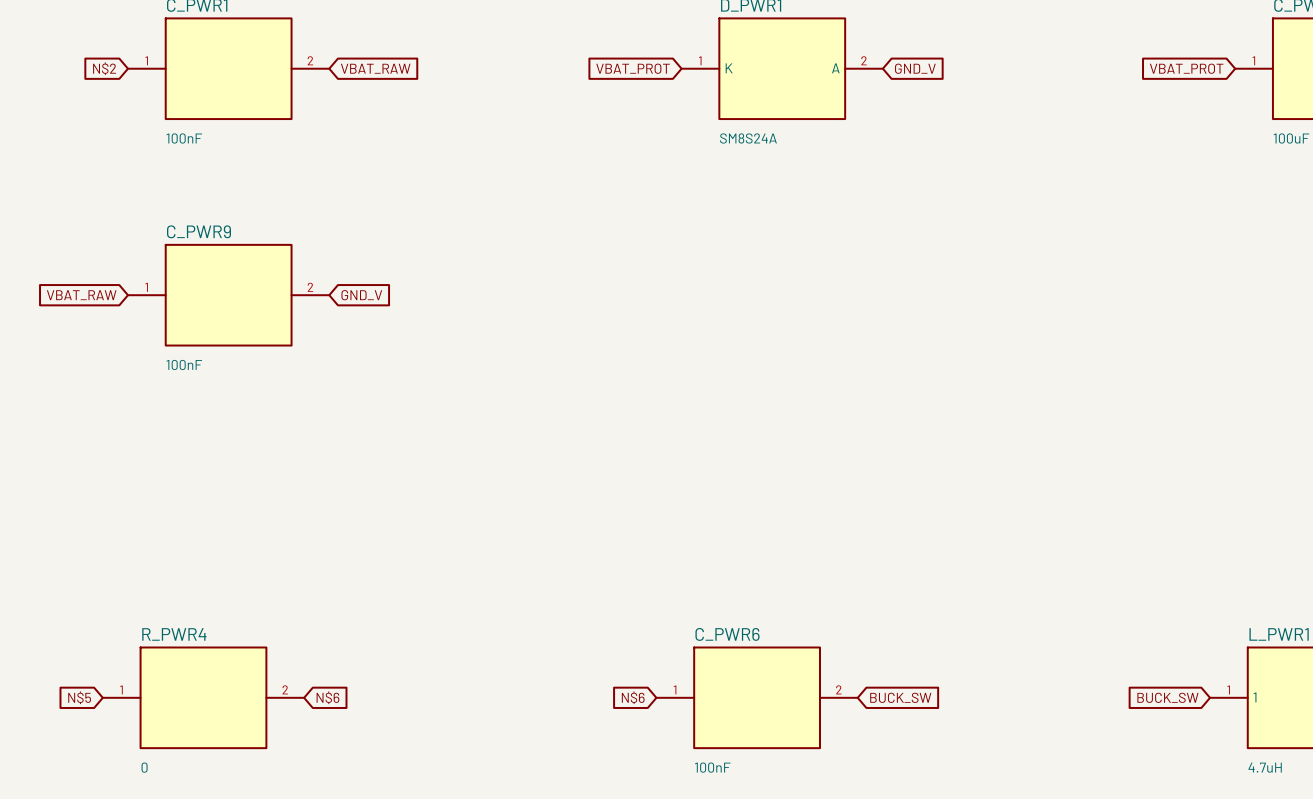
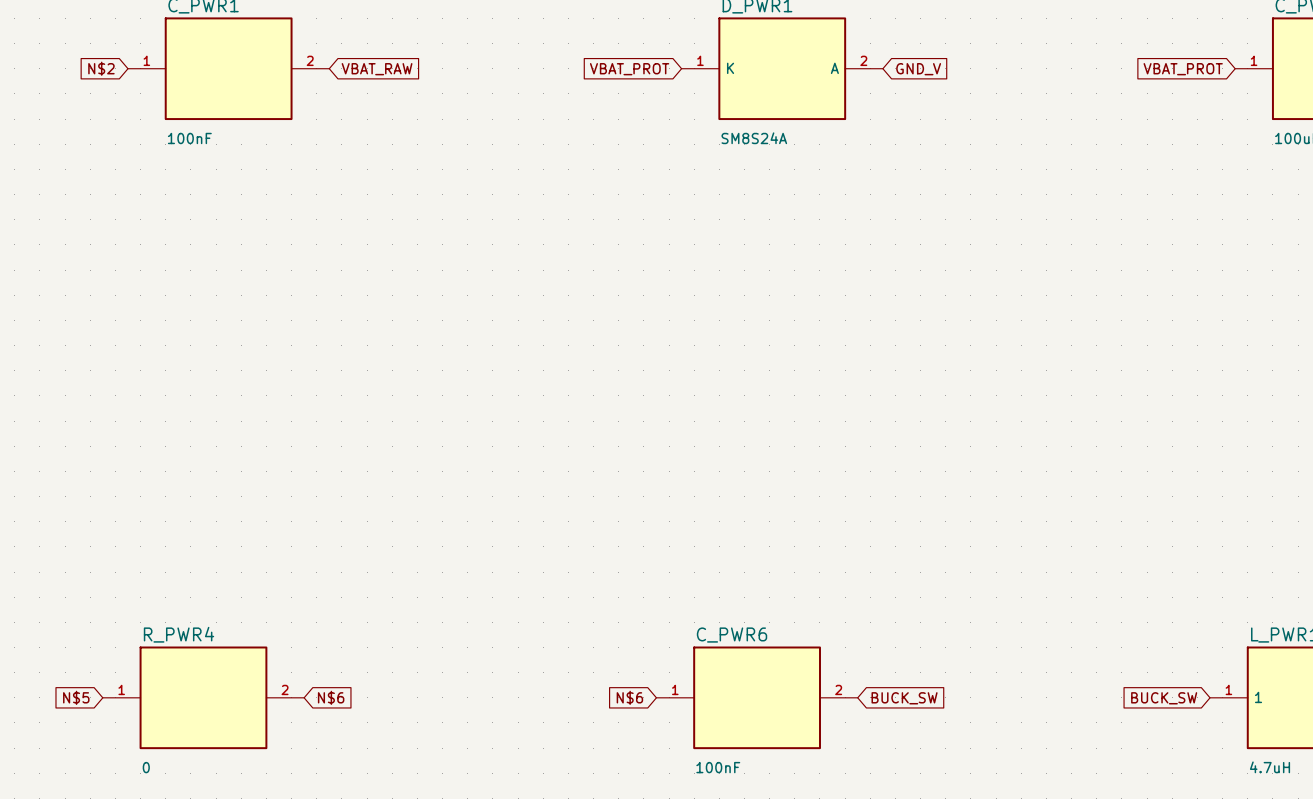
global label: VBAT_RAW (81, 295) -> none
C_PWR9: 100nF (228, 295) -> none
global label: GND_V (361, 295) -> none

